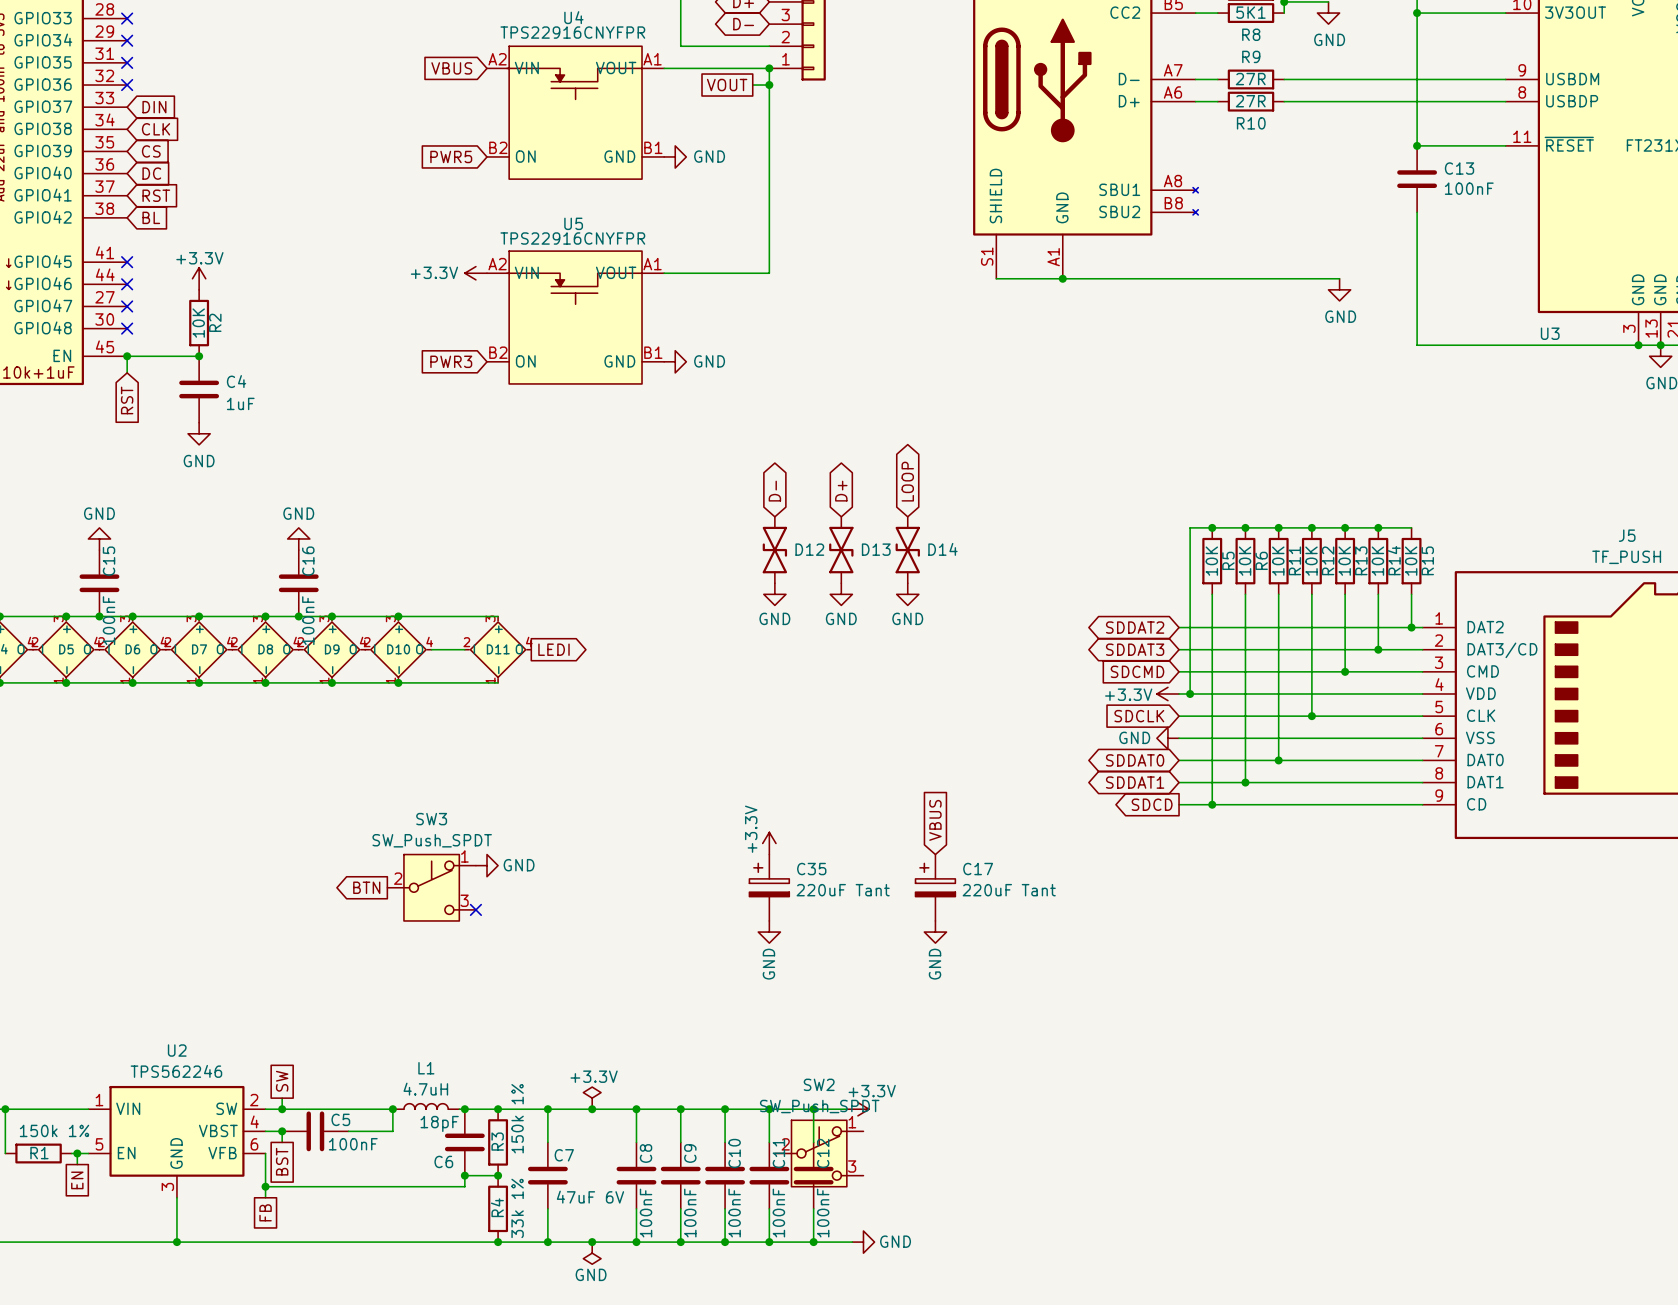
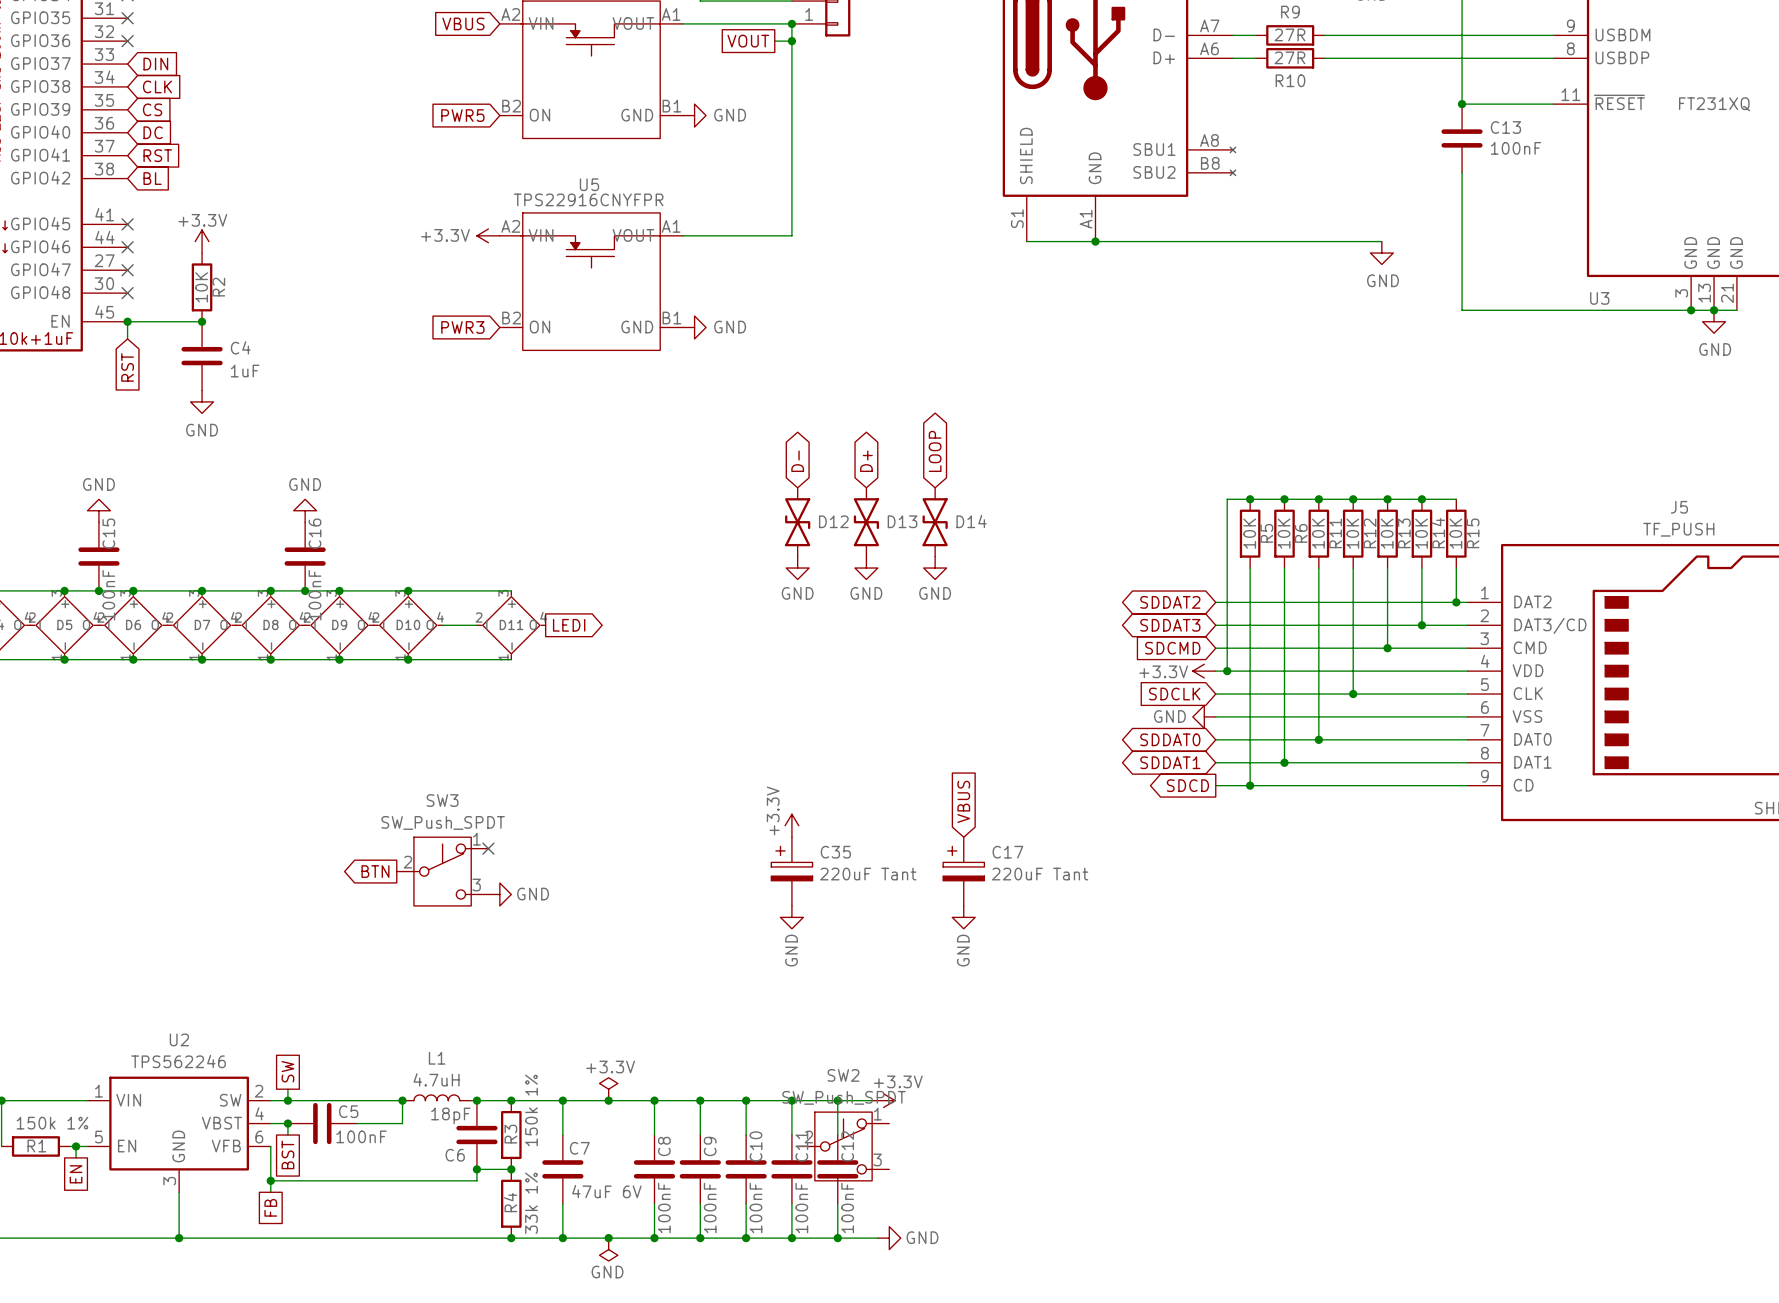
power symbol position: GND (487, 865) -> GND (499, 894)
no-connect mark position: (475, 909) -> (488, 848)

